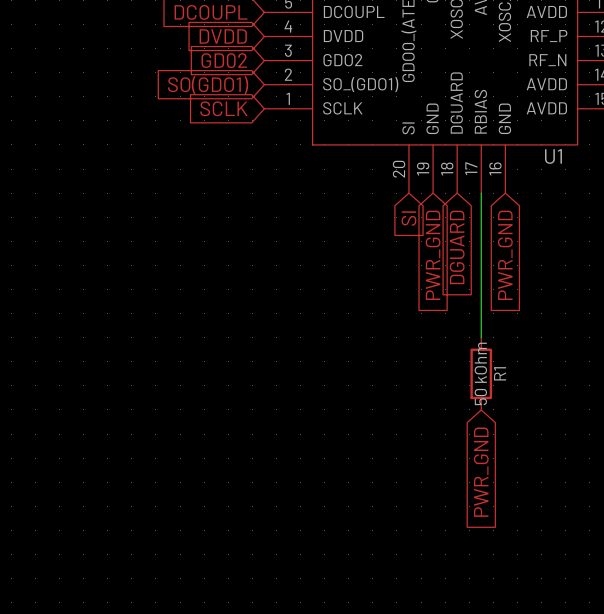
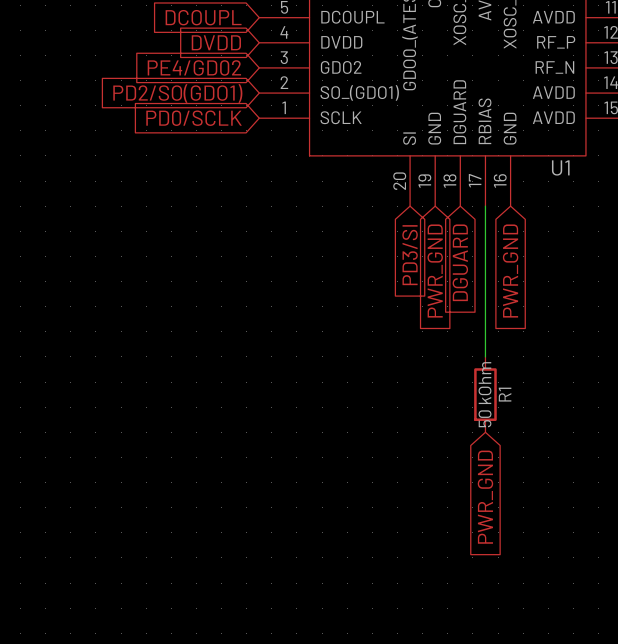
global label: GD02 (224, 60) -> PE4/GD02 (194, 67)
global label: SO(GDO1) (208, 85) -> PD2/SO(GDO1) (177, 93)
global label: SCLK (223, 108) -> PD0/SCLK (194, 118)
global label: SI (408, 218) -> PD3/SI (410, 255)

